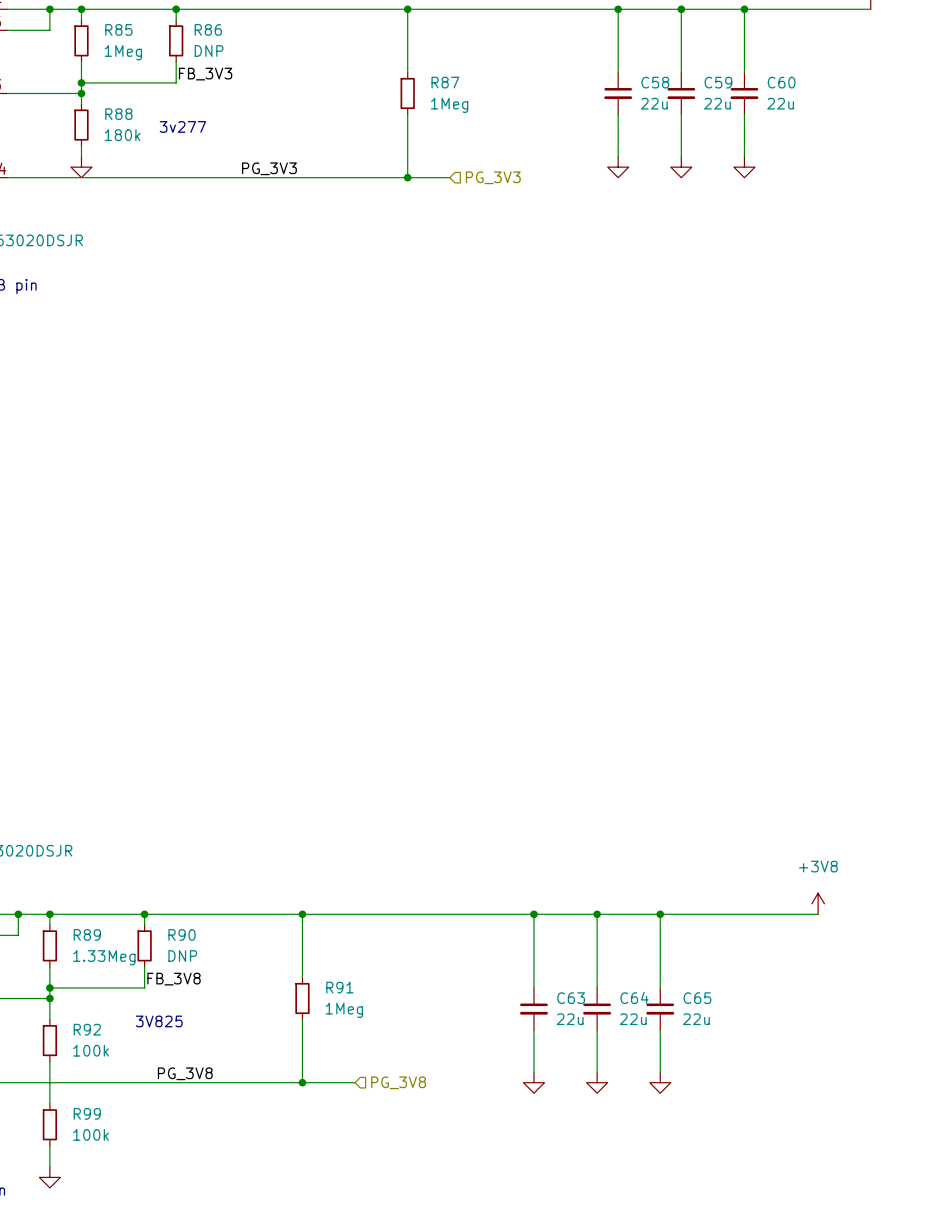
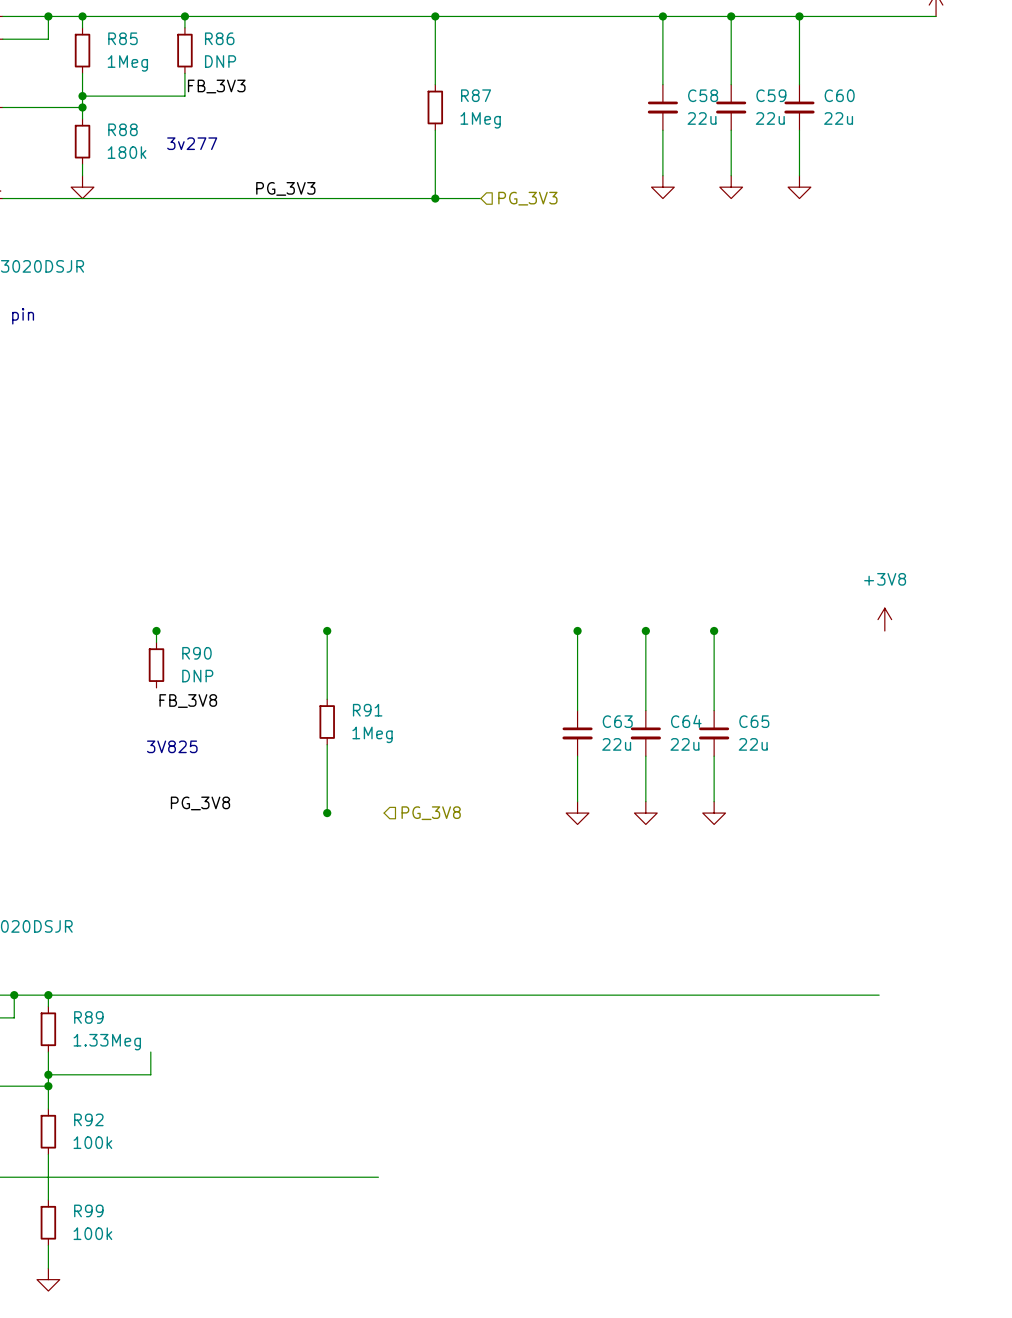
power symbol: none -> +3V8 (884, 619)
wire: none -> (156, 630) (156, 642)
junction: none -> (156, 630)
wire: none -> (327, 630) (327, 699)
junction: none -> (327, 630)
wire: none -> (577, 630) (577, 710)
junction: none -> (577, 630)
wire: none -> (645, 630) (645, 710)
junction: none -> (645, 630)
wire: none -> (714, 630) (714, 710)
junction: none -> (714, 630)
label: none -> FB_3V8 (188, 701)
wire: none -> (327, 744) (327, 813)
text: none -> 3V825 (172, 746)
wire: none -> (577, 756) (577, 801)
wire: none -> (645, 756) (645, 801)
wire: none -> (714, 756) (714, 801)
label: none -> PG_3V8 (200, 803)
junction: none -> (327, 813)
power symbol: none -> (577, 813)
power symbol: none -> (645, 813)
power symbol: none -> (714, 813)
hierarchical label: none -> PG_3V8 (431, 813)
power symbol: +3V8 (818, 903) -> none
wire: (144, 914) (144, 924) -> none
junction: (144, 914) -> none
wire: (302, 914) (302, 977) -> none
junction: (302, 914) -> none
wire: (533, 914) (533, 987) -> none
junction: (533, 914) -> none
wire: (597, 914) (597, 987) -> none
junction: (597, 914) -> none
wire: (660, 914) (660, 987) -> none
junction: (660, 914) -> none
R90 position: (144, 945) -> (156, 665)
label: FB_3V8 (174, 979) -> none
R91 position: (302, 998) -> (327, 722)
C63 position: (533, 1009) -> (577, 733)
C64 position: (597, 1009) -> (645, 733)
C65 position: (660, 1009) -> (714, 733)
wire: (302, 1019) (302, 1082) -> none
text: 3V825 (159, 1021) -> none
wire: (533, 1030) (533, 1072) -> none
wire: (597, 1030) (597, 1072) -> none
wire: (660, 1030) (660, 1072) -> none
label: PG_3V8 (185, 1073) -> none
junction: (302, 1082) -> none
hierarchical label: PG_3V8 (398, 1082) -> none
power symbol: (533, 1082) -> none
power symbol: (597, 1082) -> none
power symbol: (660, 1082) -> none

